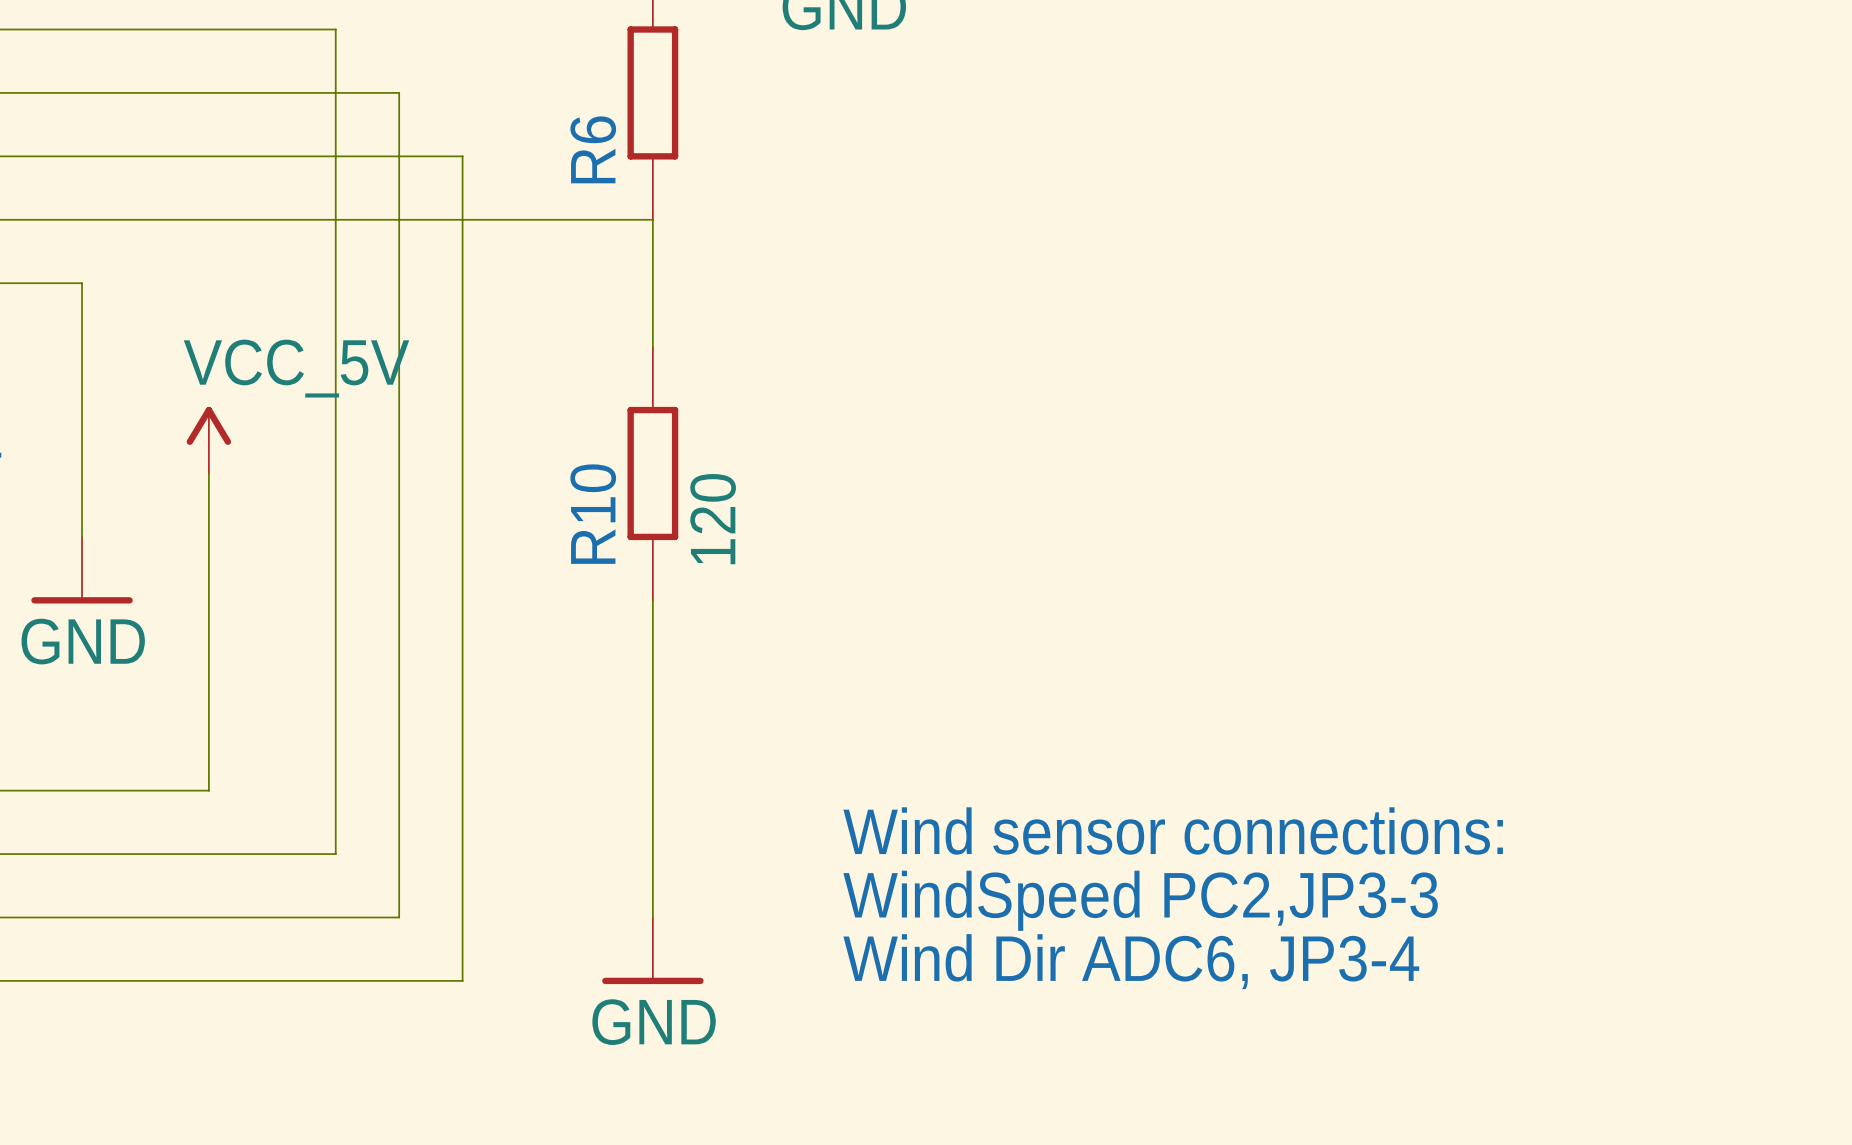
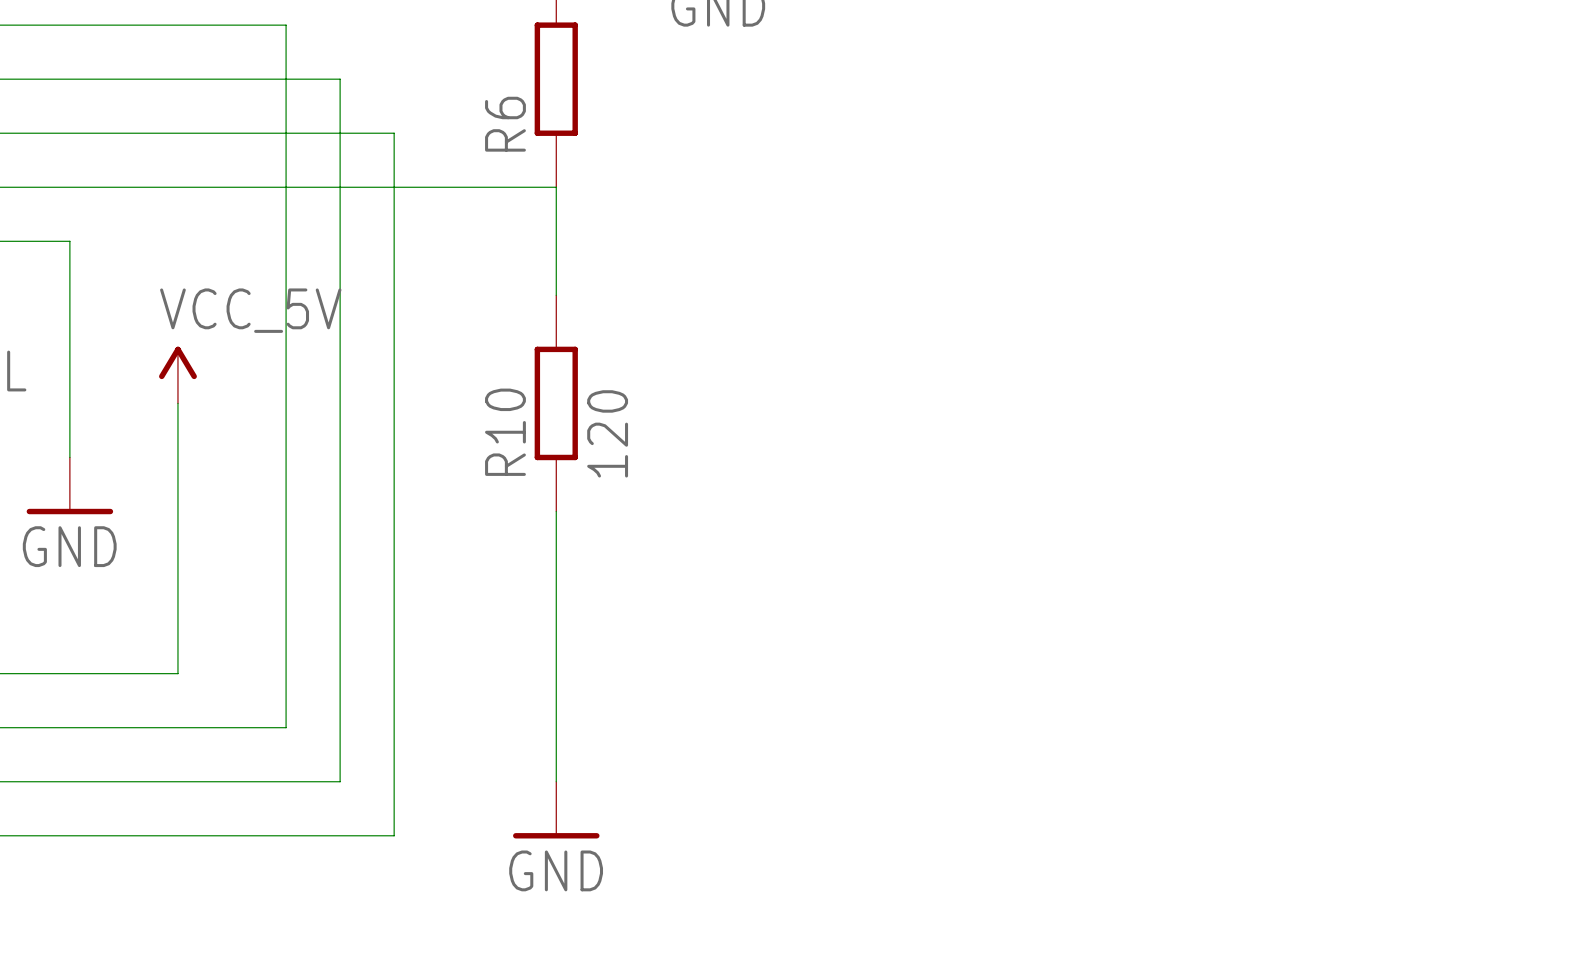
text: Wind sensor connections: (1173, 830) -> none
text: WindSpeed PC2,JP3-3 (1140, 900) -> none
text: Wind Dir ADC6, JP3-4 (1131, 961) -> none

